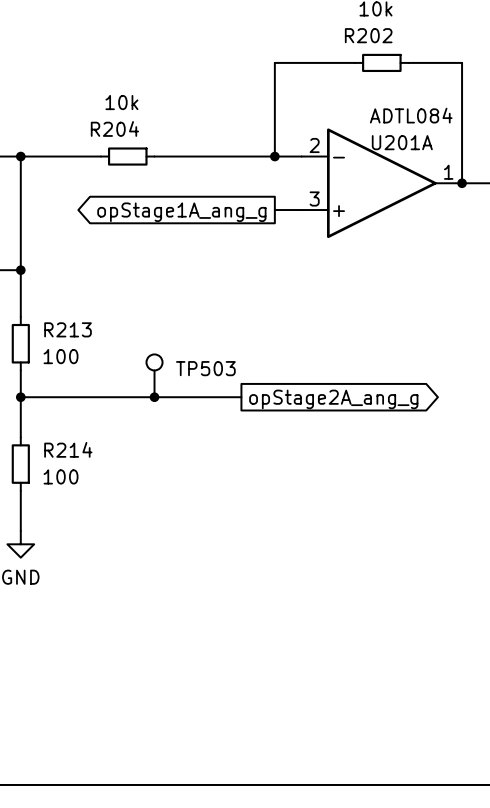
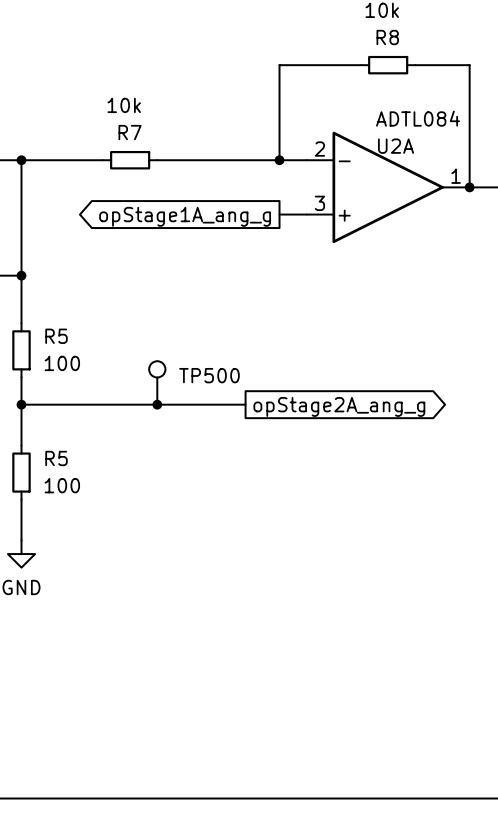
R202 name: R202 (368, 35) -> R8 (387, 37)
R204 name: R204 (114, 128) -> R7 (130, 132)
U201A name: U201A (402, 142) -> U2A (396, 146)
R213 name: R213 (68, 329) -> R5 (56, 336)
TP503 name: TP503 (205, 368) -> TP500 (209, 375)
R214 name: R214 (68, 449) -> R5 (56, 458)

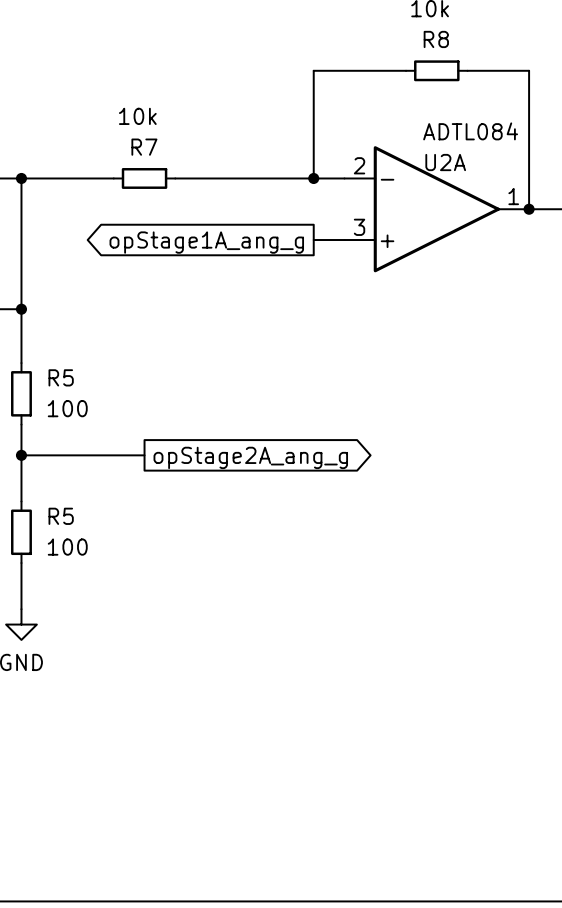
TP500: (157, 382) -> none
wire: (130, 404) (245, 404) -> none
junction: (157, 404) -> none
global label position: opStage2A_ang_g (339, 406) -> opStage2A_ang_g (250, 457)

